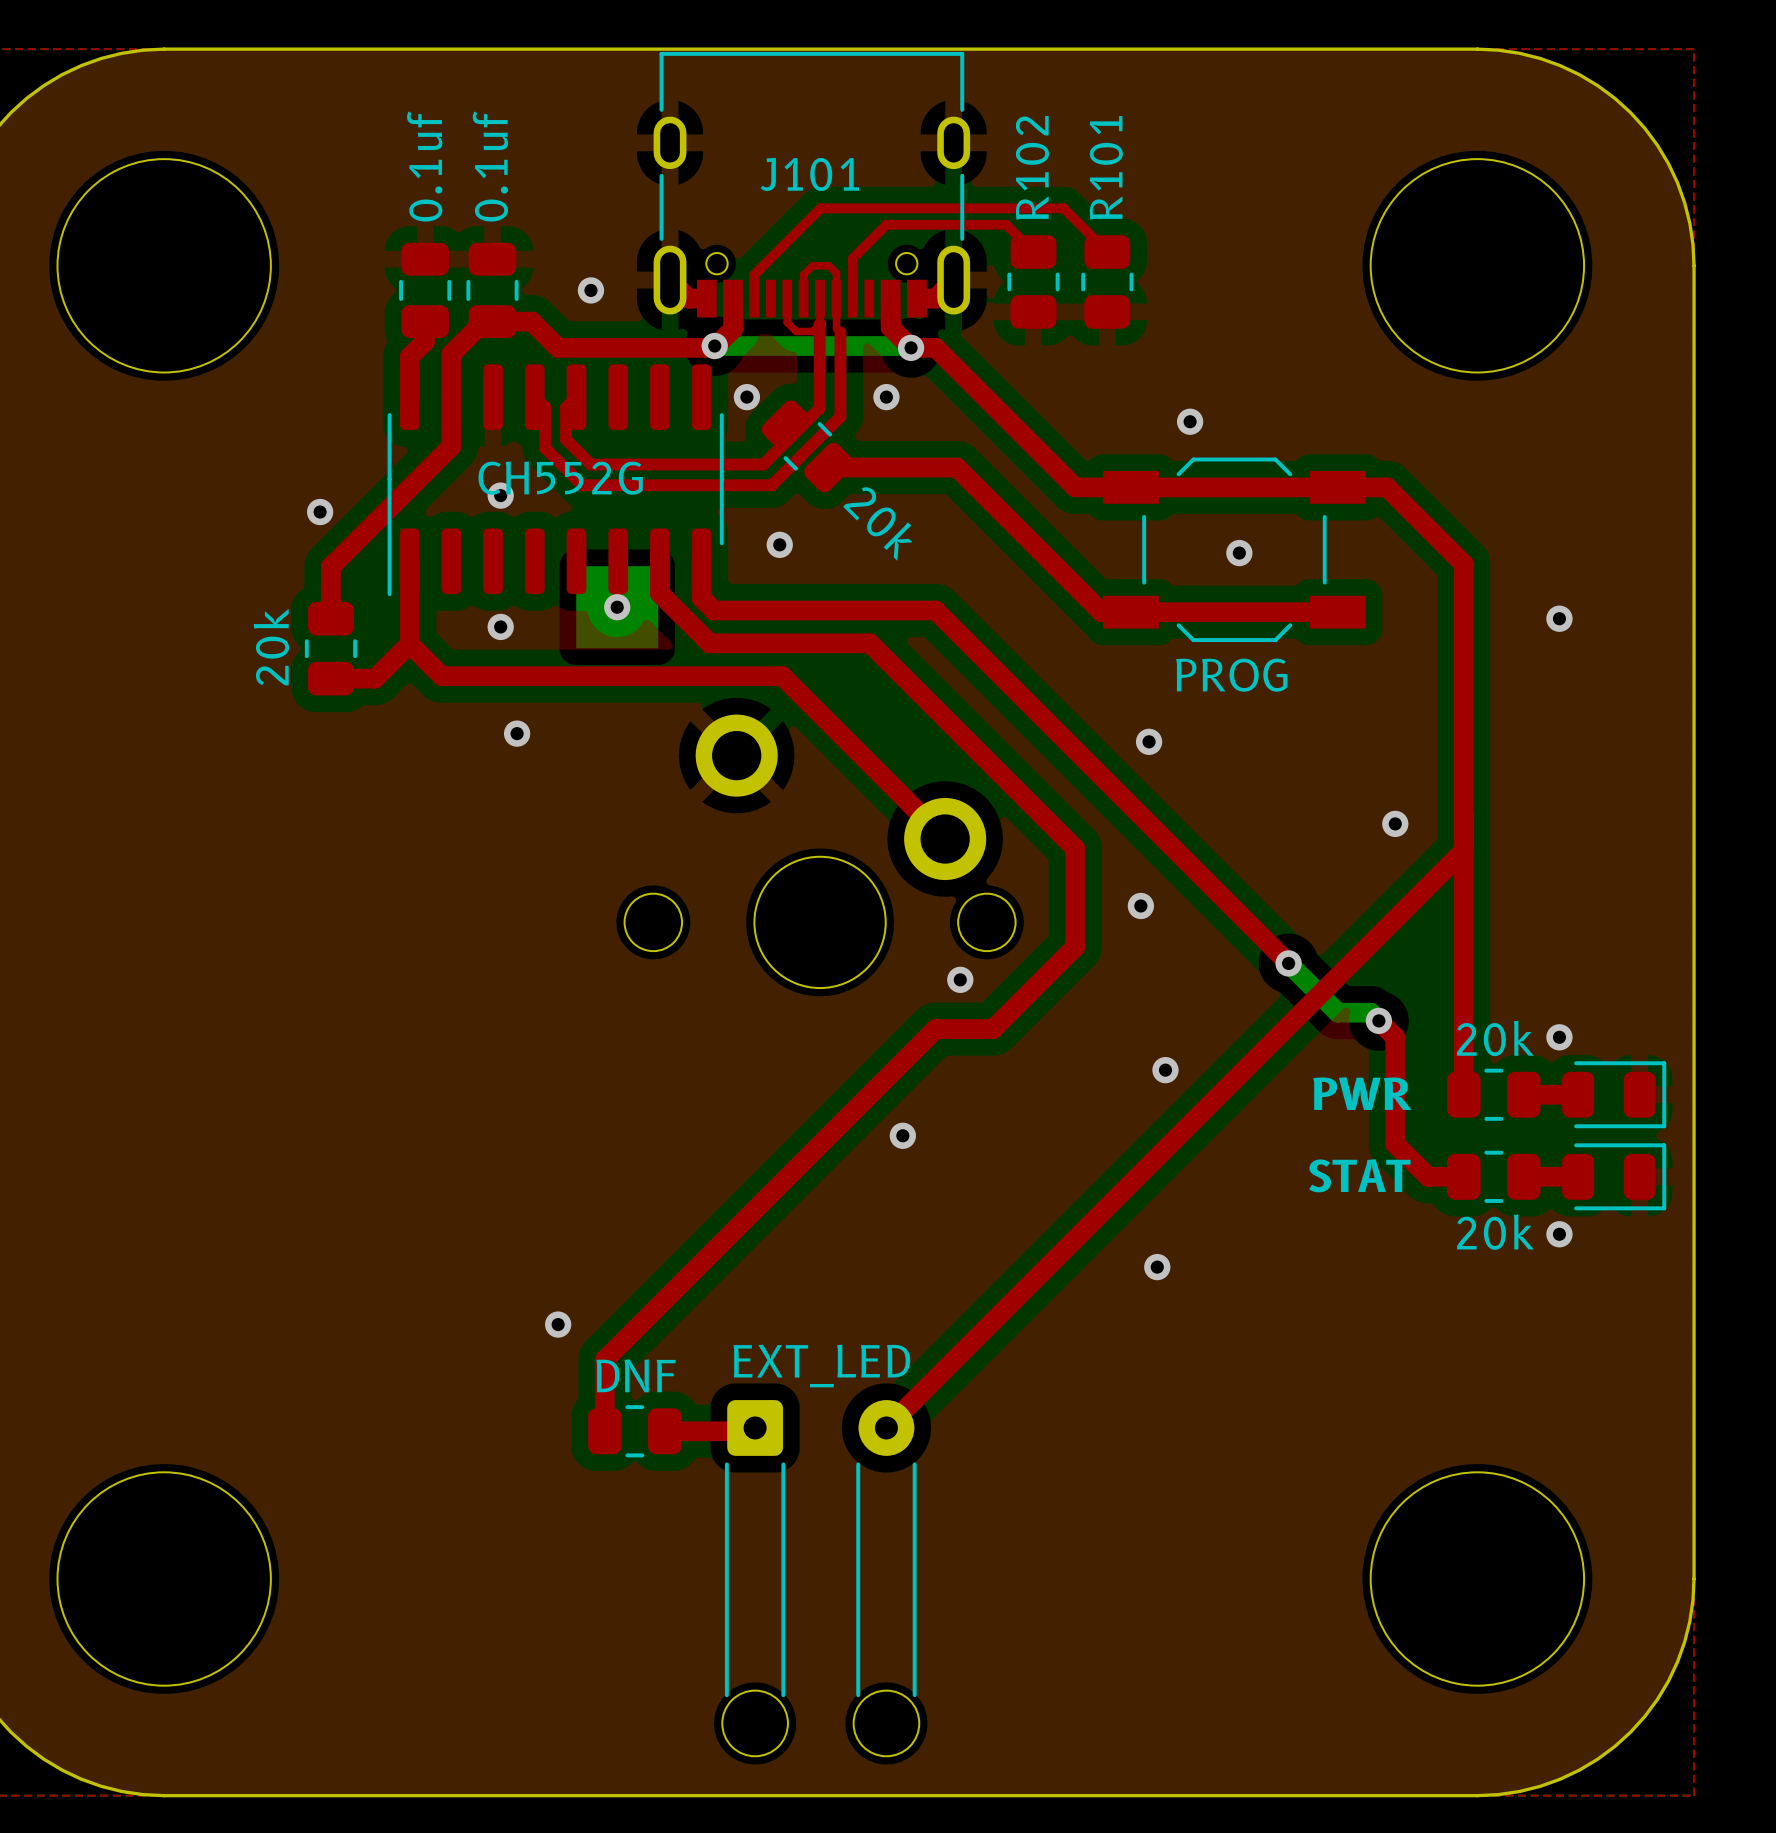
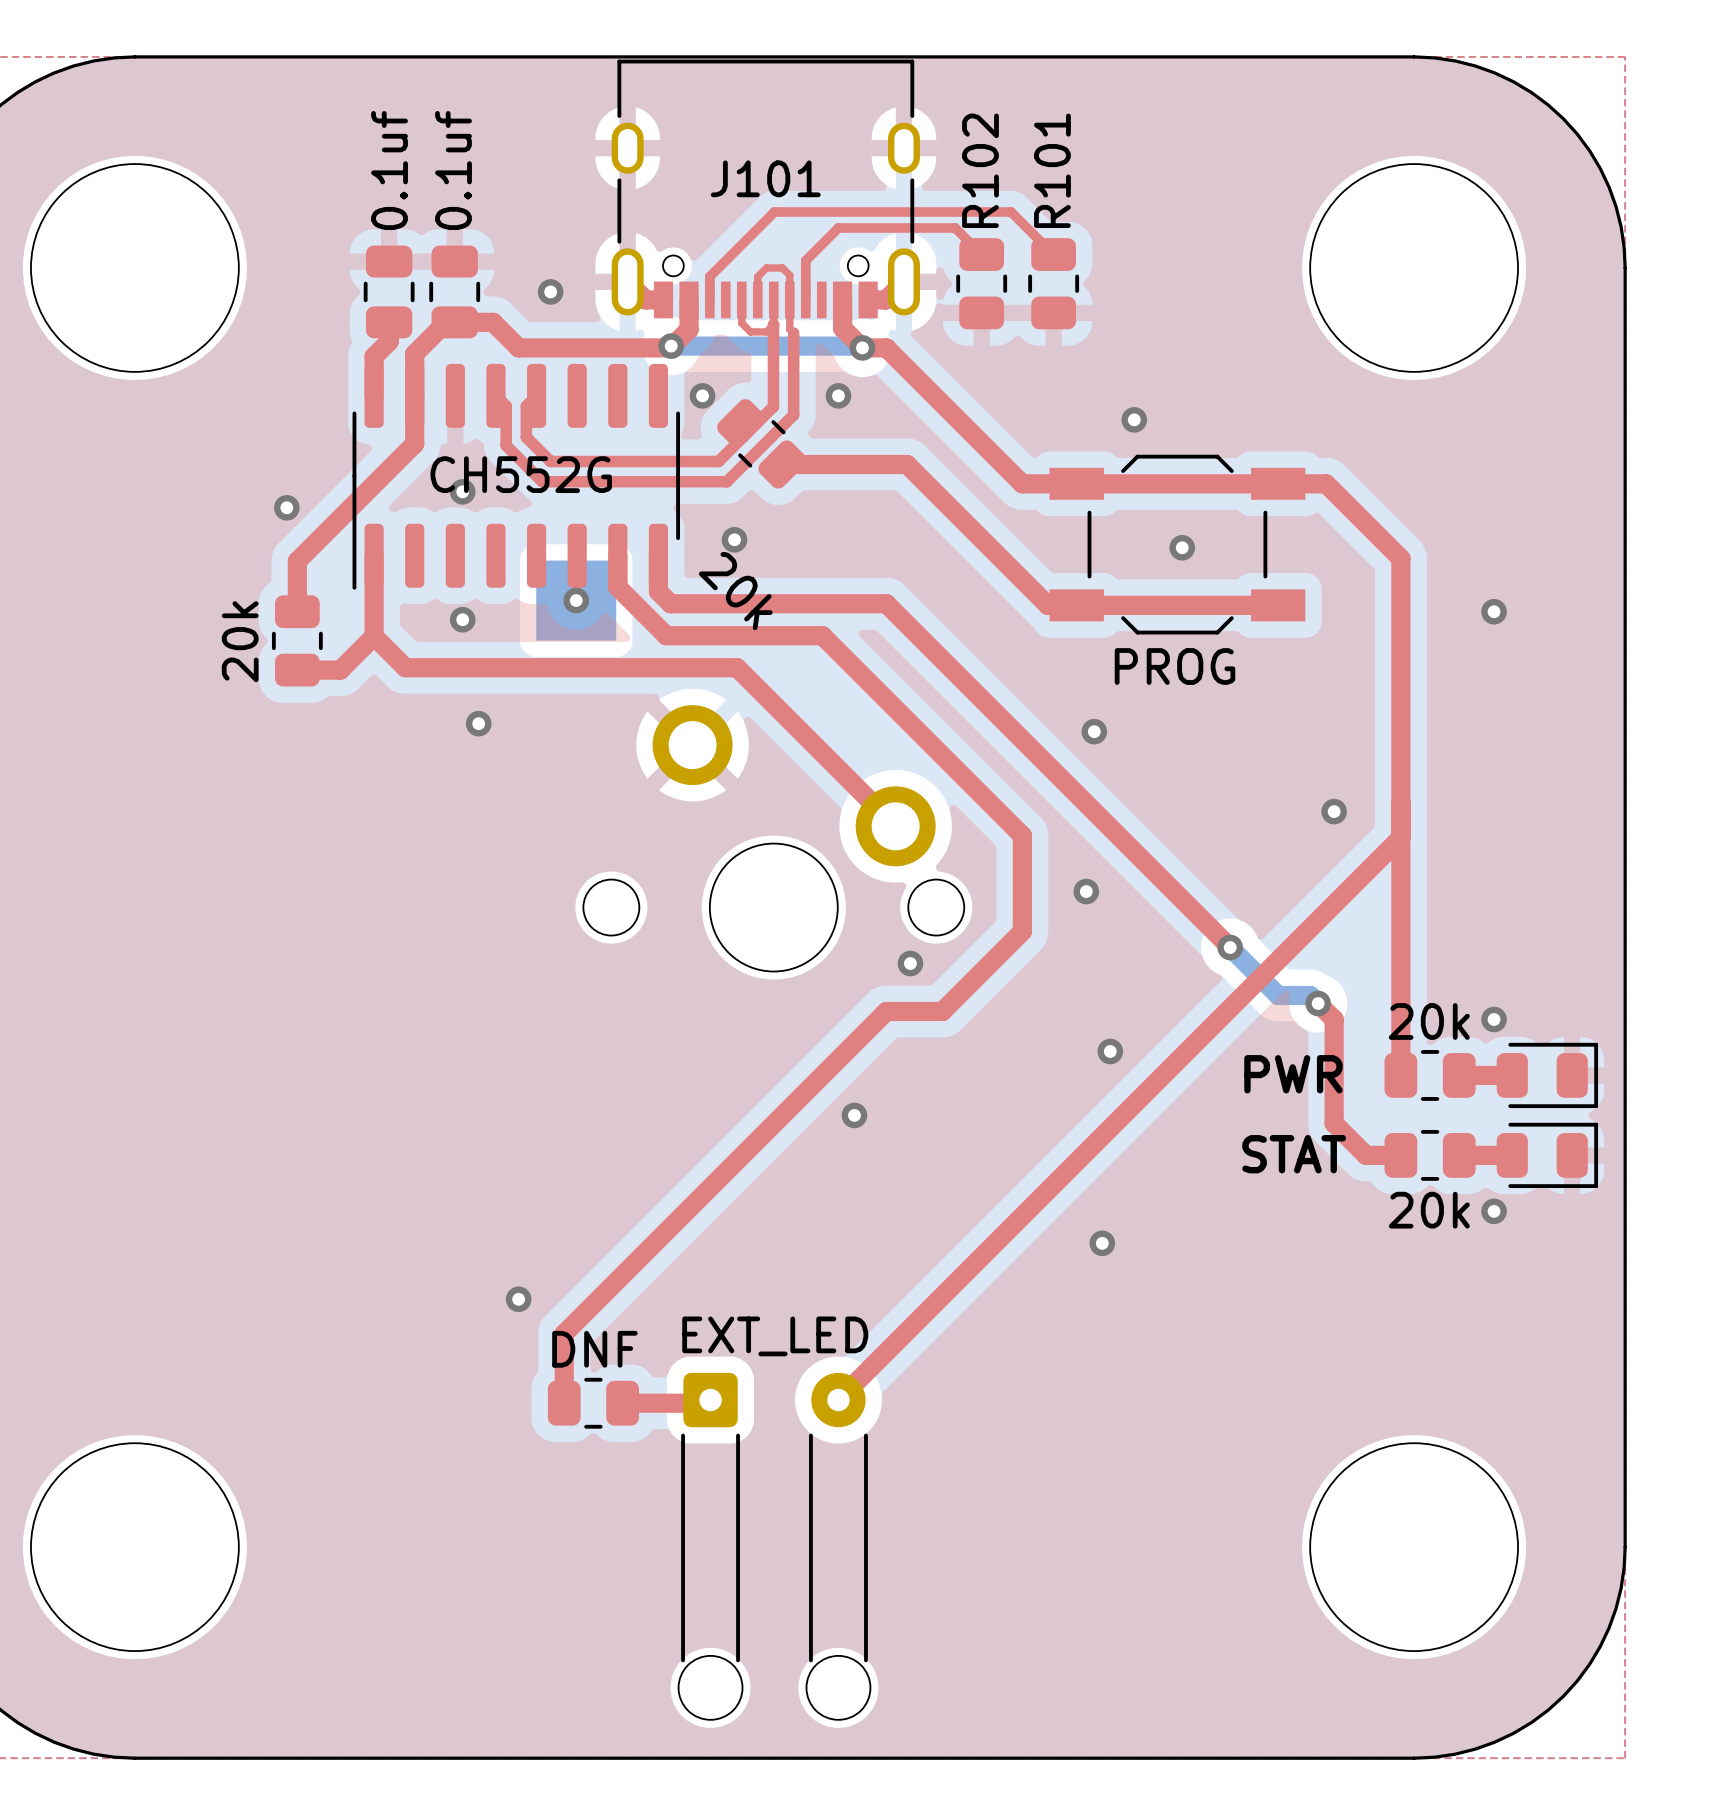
part value position: 20k (877, 524) -> 20k (735, 591)

